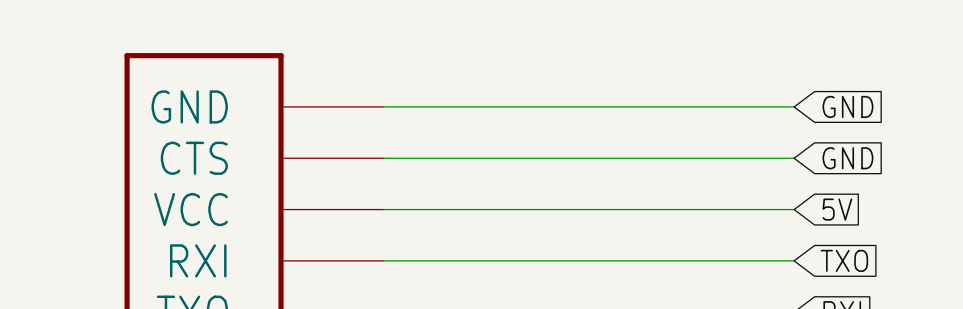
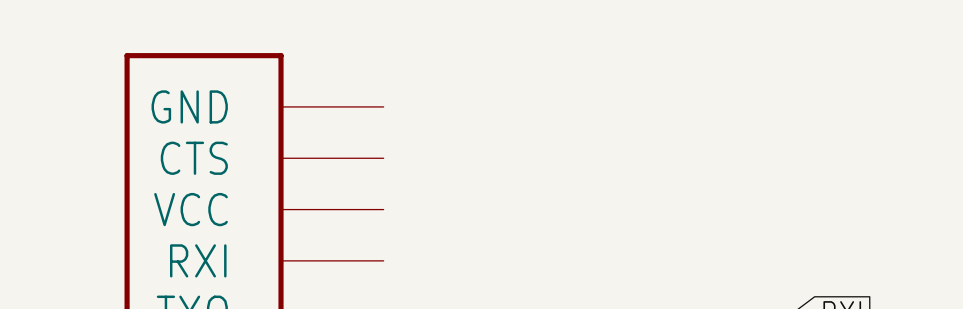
wire: (383, 106) (794, 106) -> none
global label: GND (847, 106) -> none
wire: (383, 158) (794, 158) -> none
global label: GND (847, 158) -> none
wire: (383, 209) (794, 209) -> none
global label: 5V (837, 209) -> none
wire: (383, 260) (794, 260) -> none
global label: TXO (844, 260) -> none

